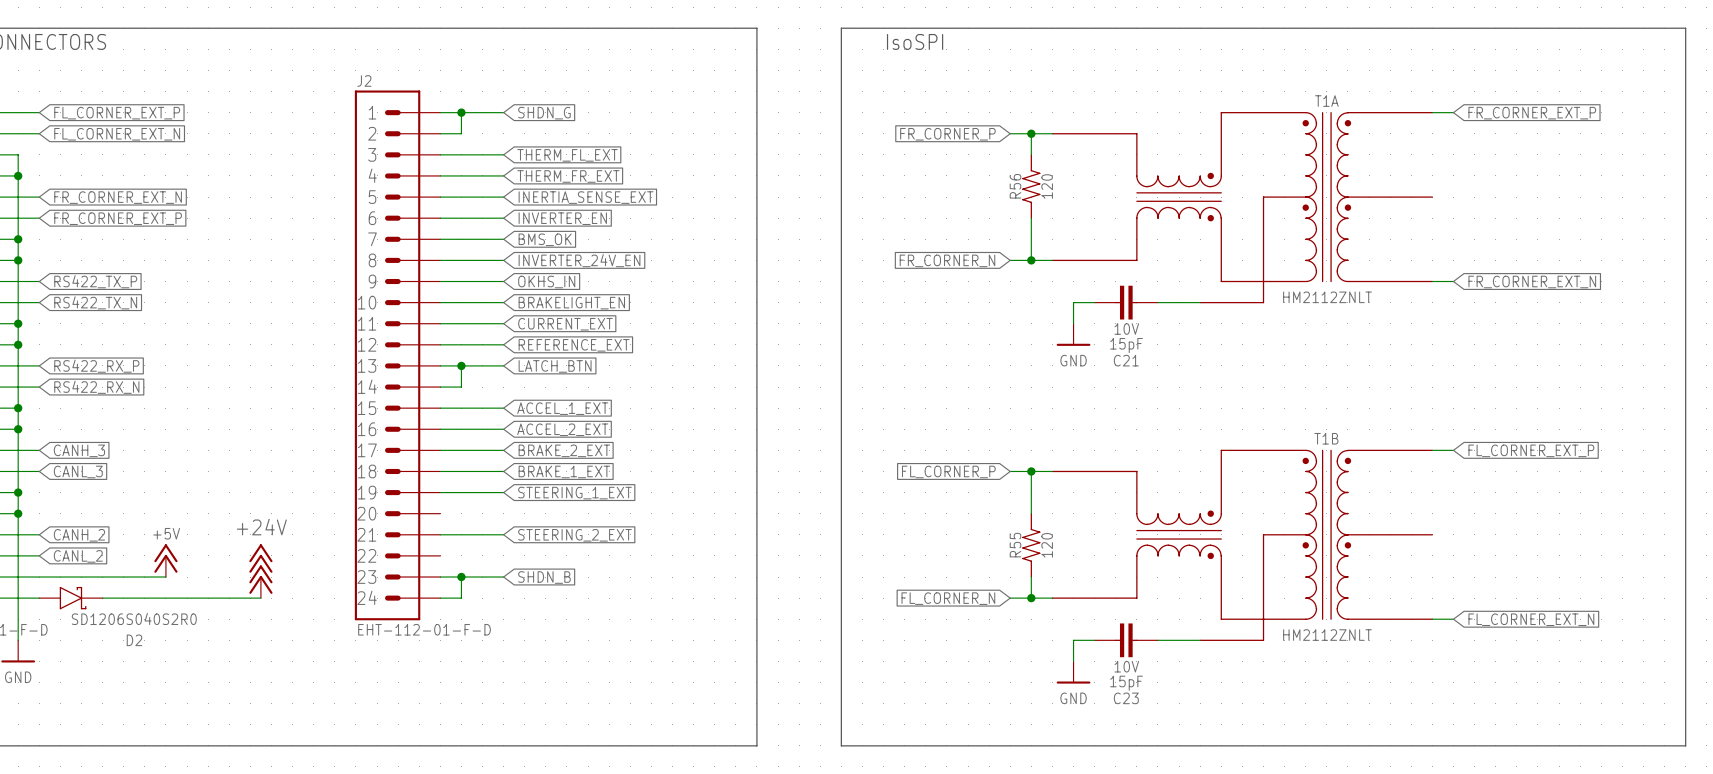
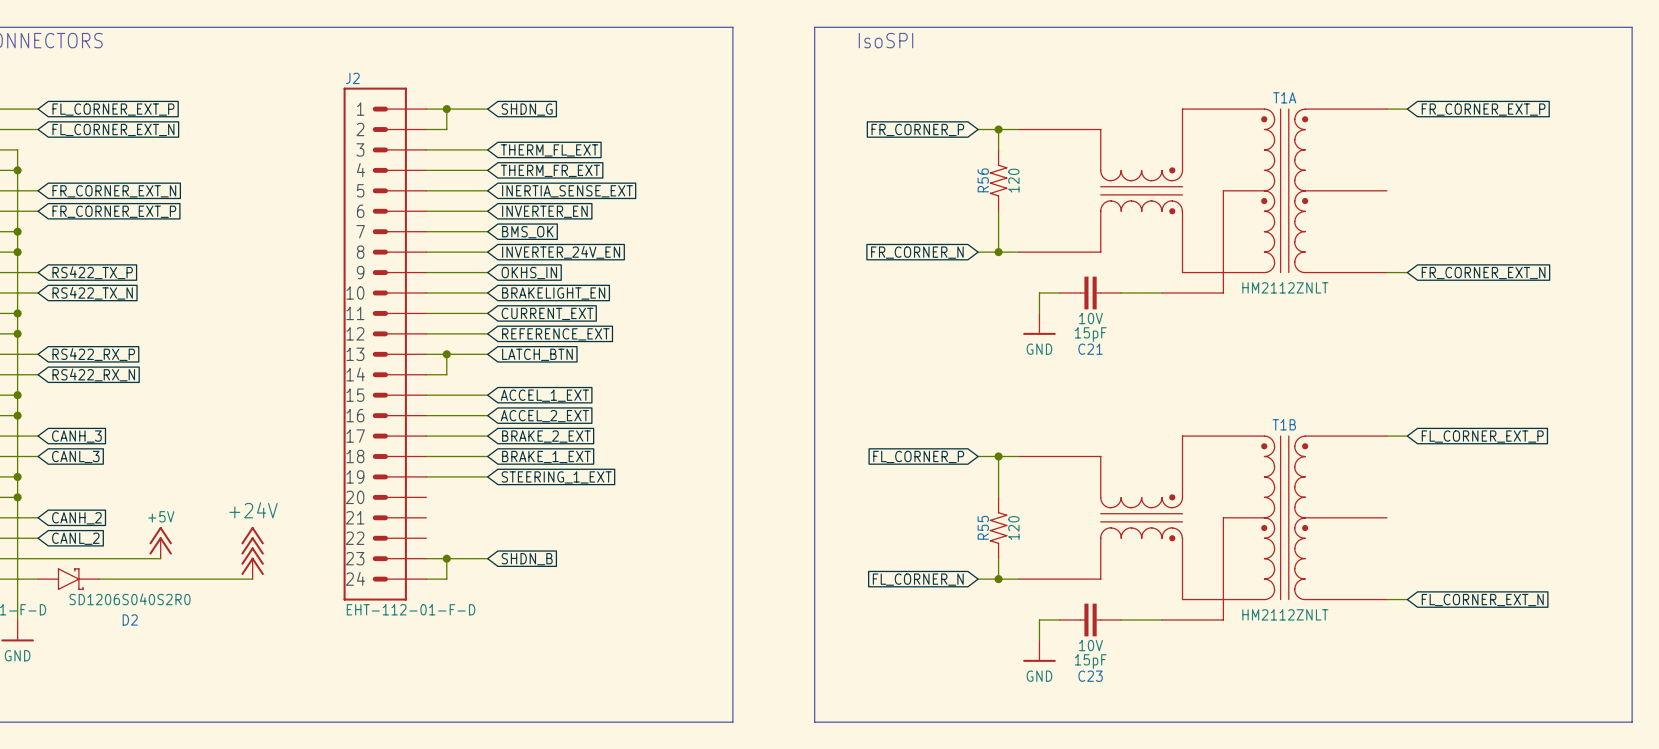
wire: (440, 534) (503, 534) -> none
global label: STEERING_2_EXT (574, 535) -> none

